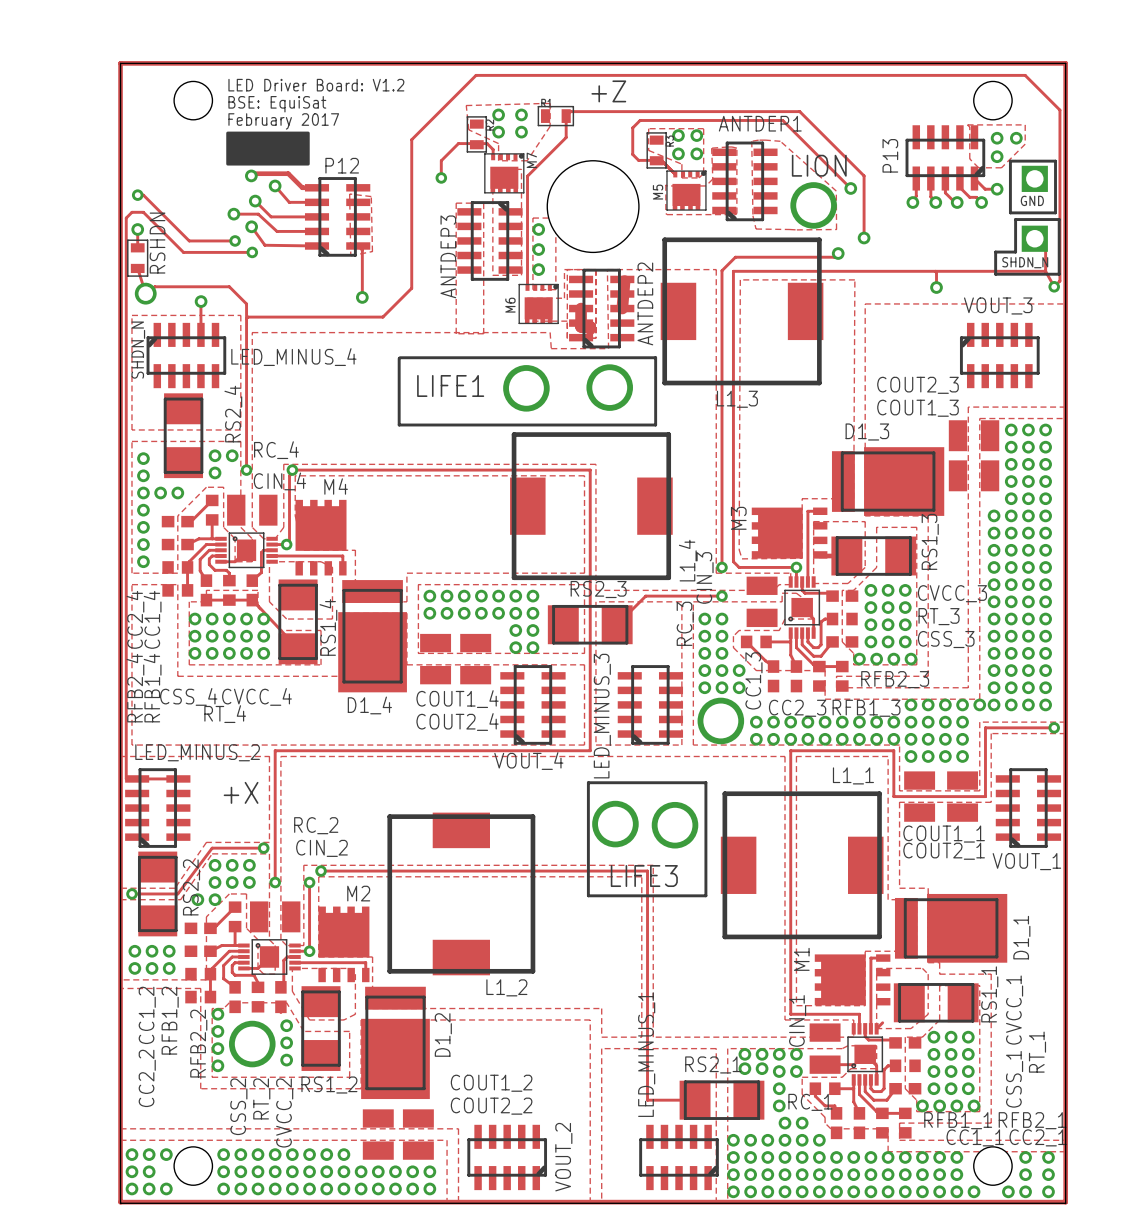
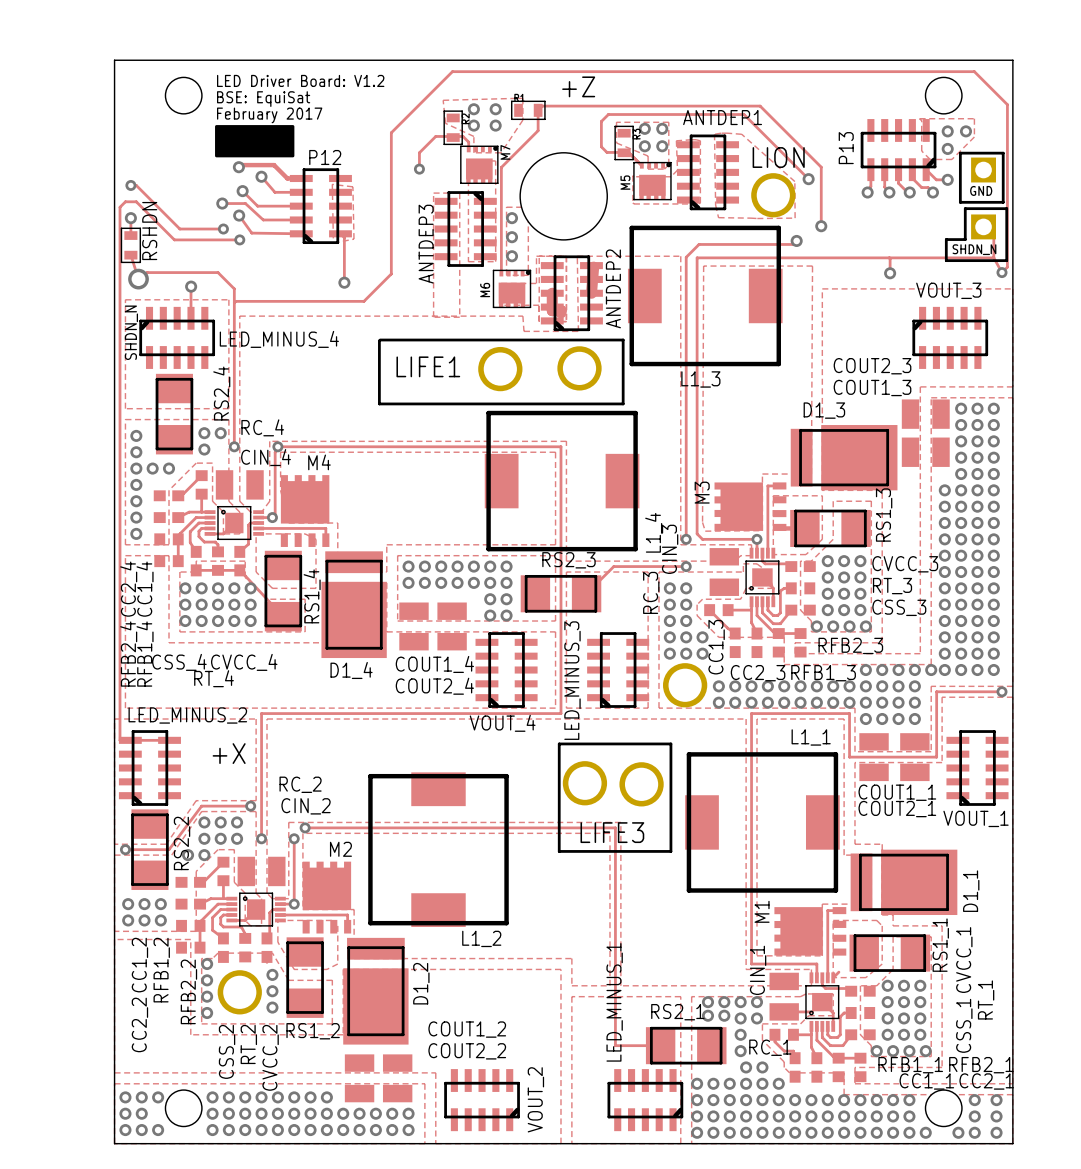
track: (120, 63) (1065, 63) (1065, 1202) (120, 1202) (120, 63) -> none

